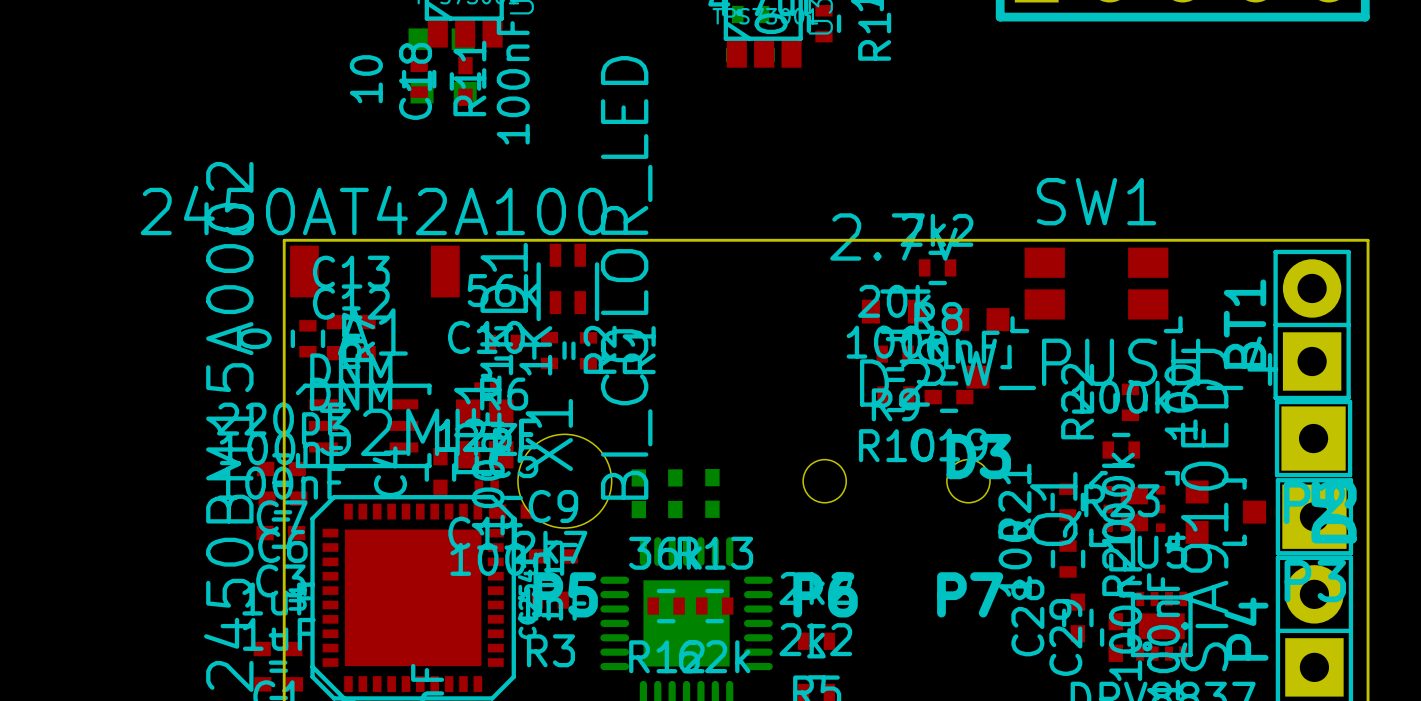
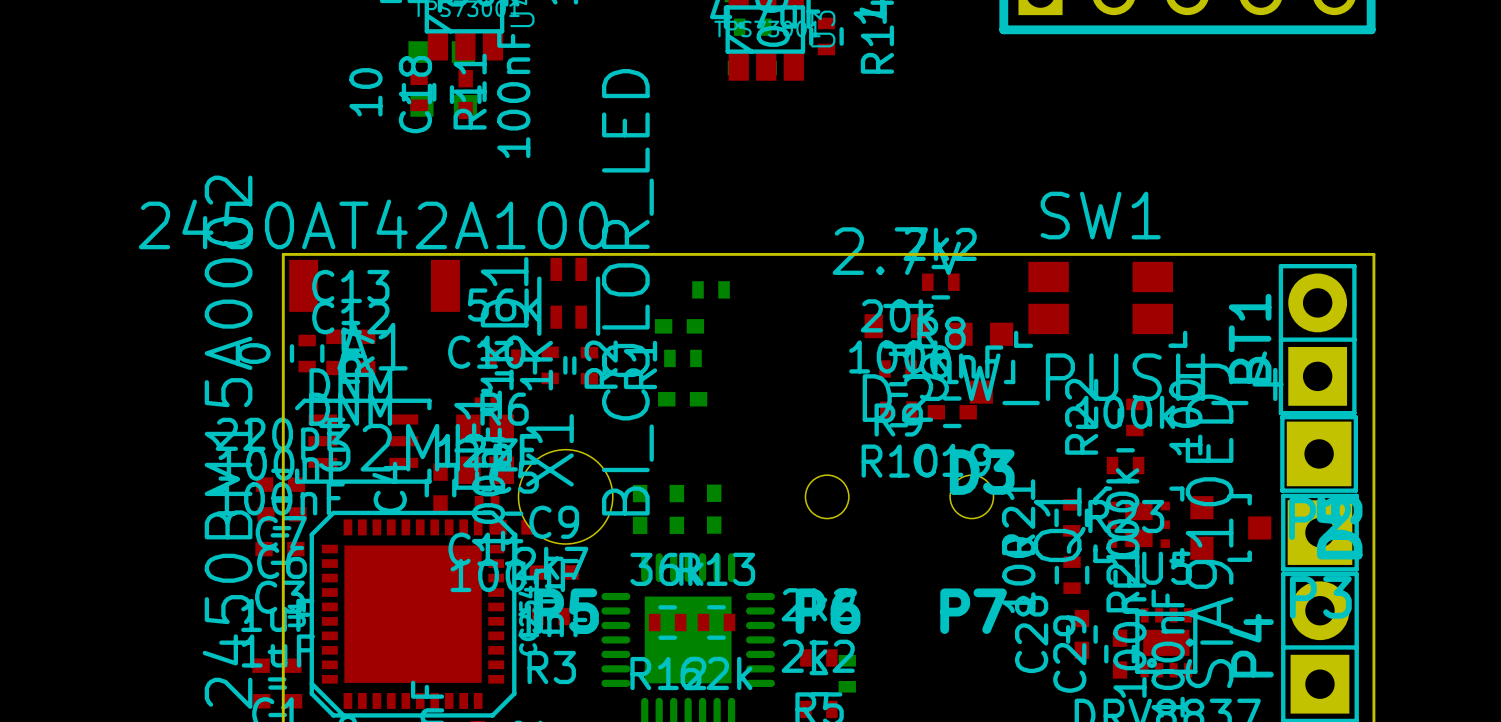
part: none -> (711, 289)
part: none -> (679, 326)
part: none -> (682, 358)
part: none -> (682, 399)
part: none -> (847, 673)

